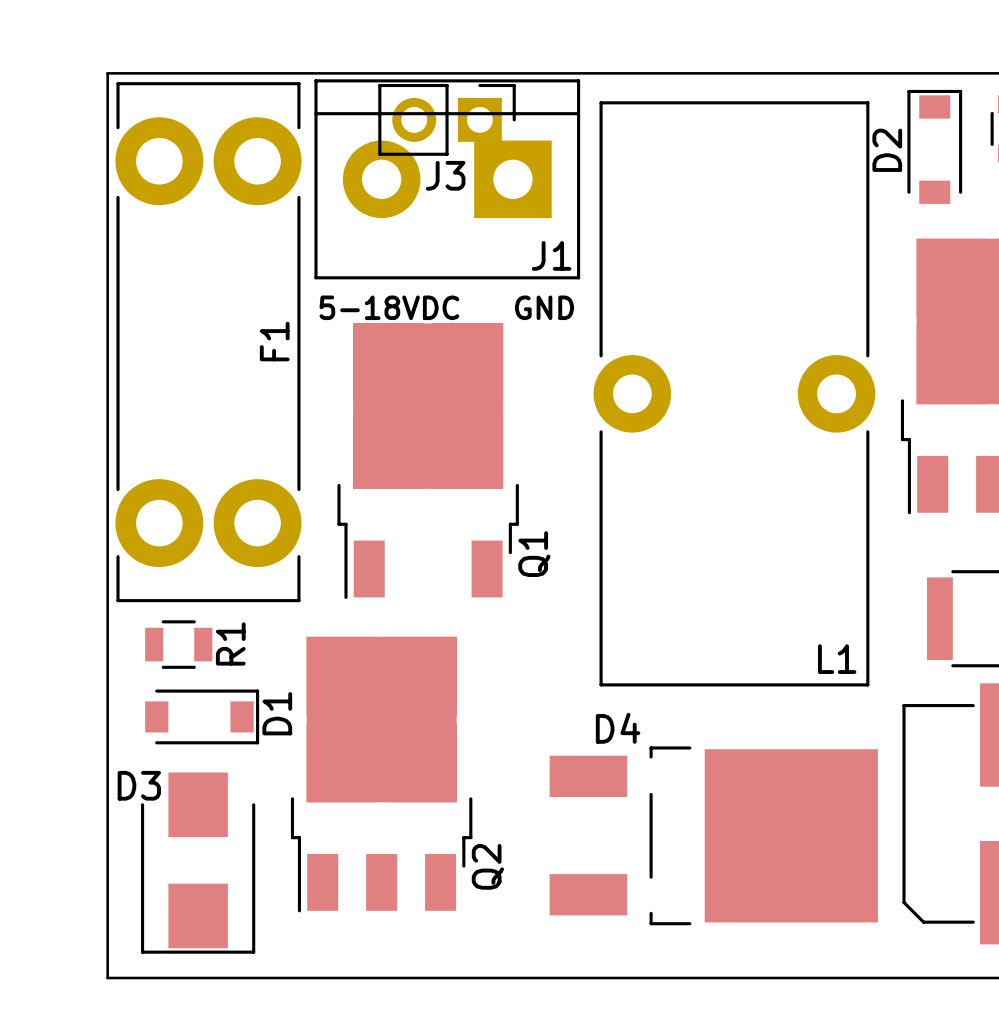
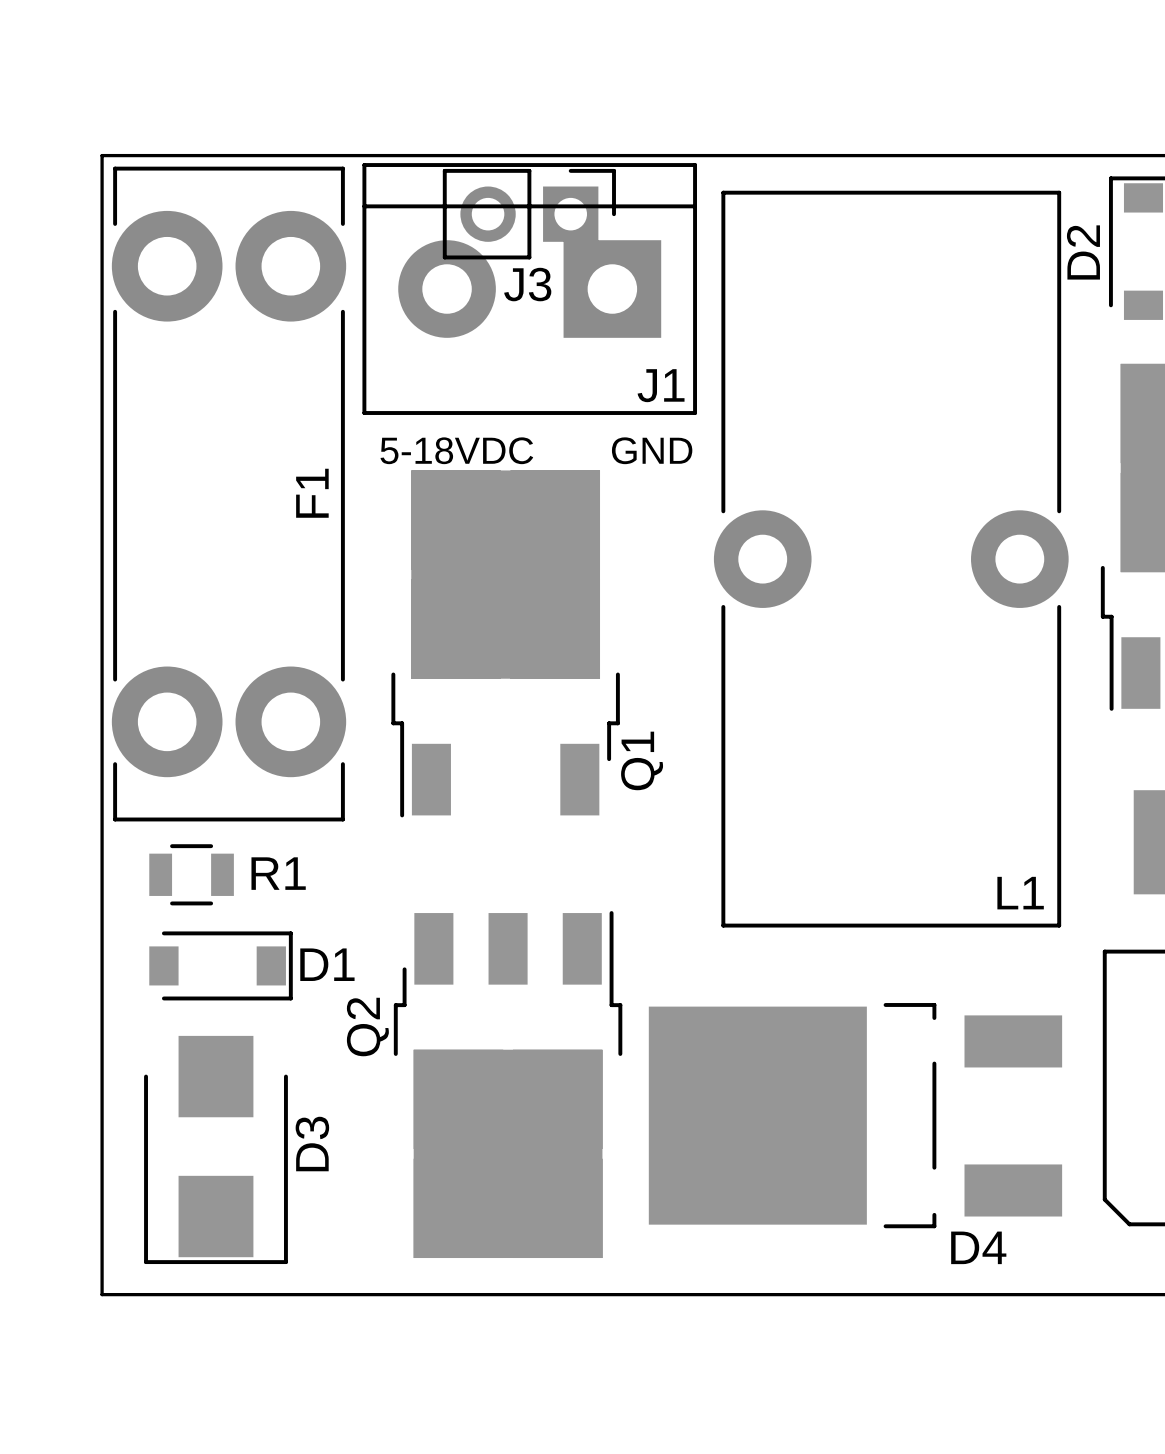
R1 name rotation: 0° (230, 643) -> 90° clockwise (278, 873)
D1 name rotation: 0° (277, 713) -> 90° clockwise (327, 964)
Q2 rotation: 0° (381, 774) -> 180° (508, 1084)
D3 name rotation: 0° (139, 785) -> 90° counterclockwise (312, 1144)
D3 name position: D3 (139, 785) -> D3 (312, 1144)
D4 rotation: 0° (713, 835) -> 180° (855, 1115)

